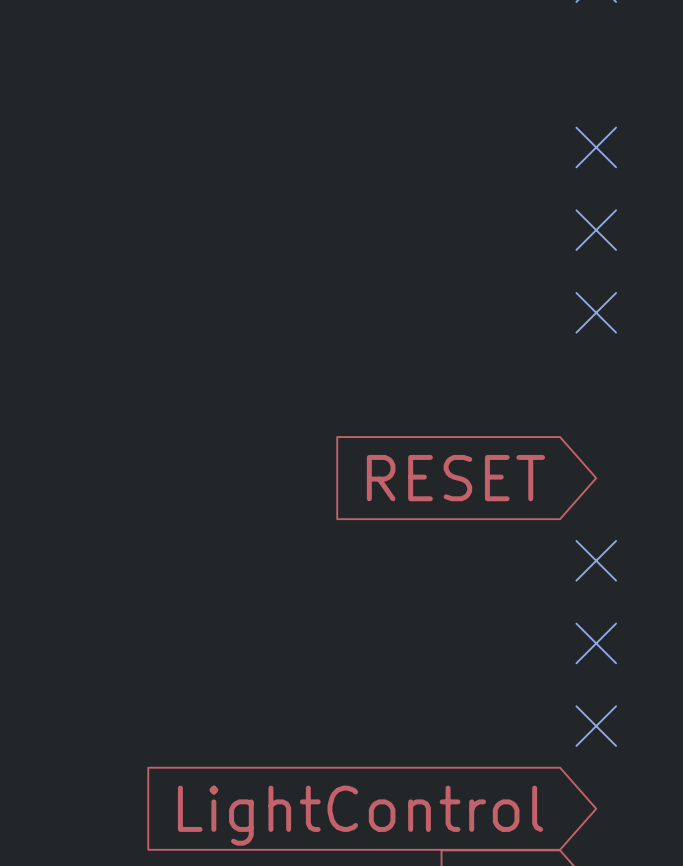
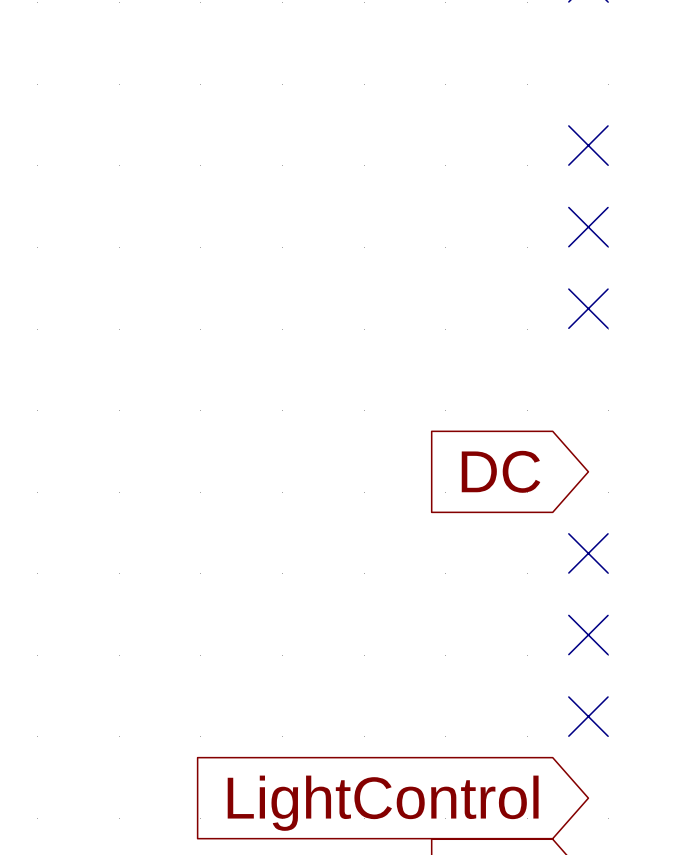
global label: RESET (455, 478) -> DC (501, 471)

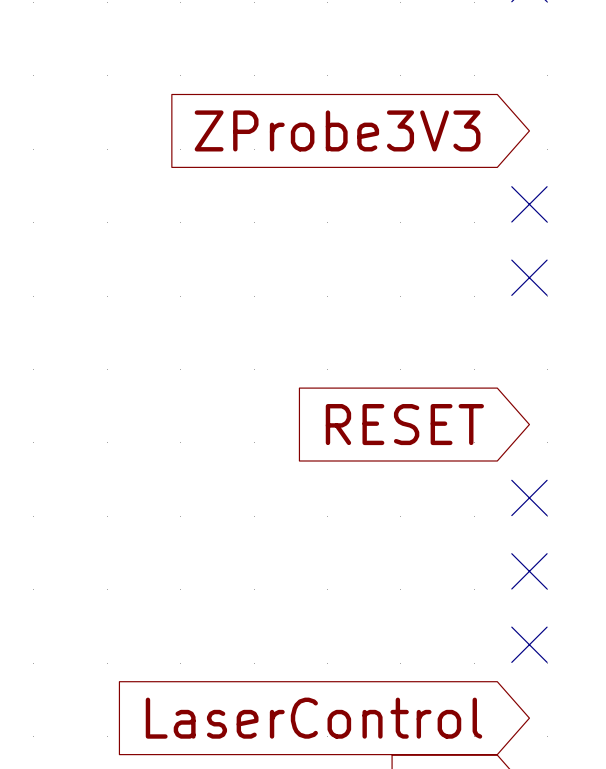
global label: none -> ZProbe3V3 (337, 130)
no-connect mark: (588, 145) -> none
global label: DC (501, 471) -> RESET (404, 424)
global label: LightControl (383, 803) -> LaserControl (313, 718)

